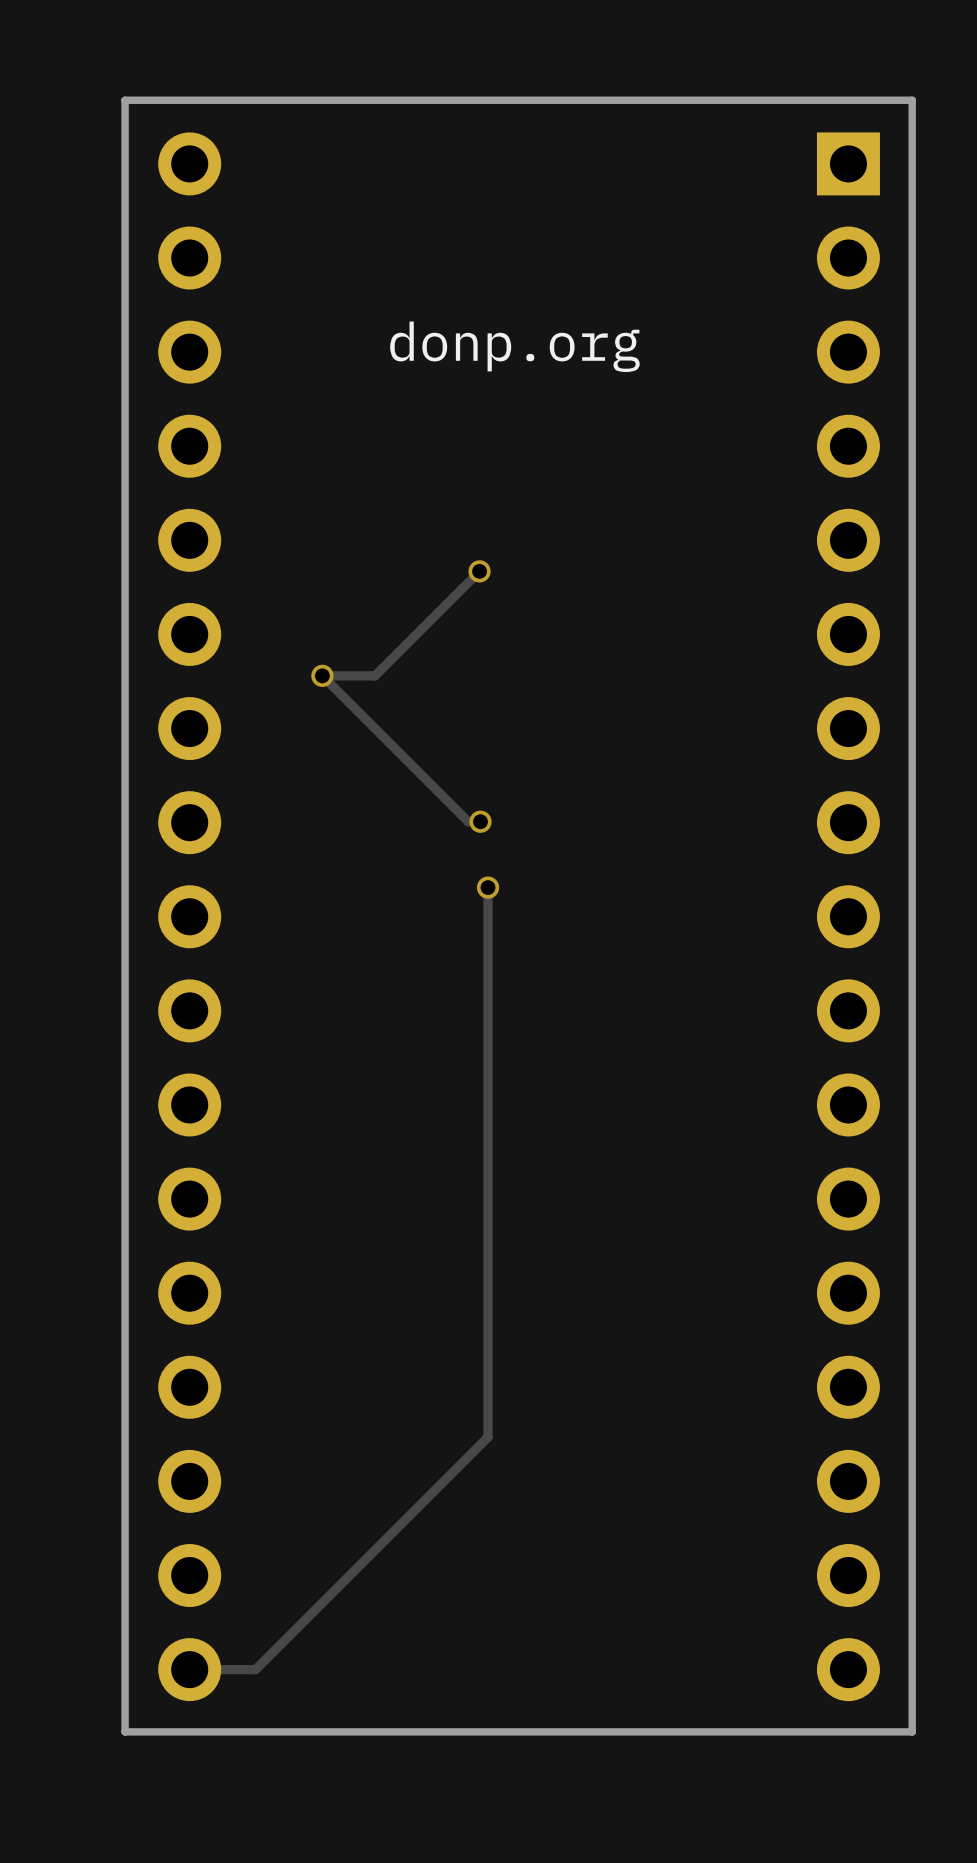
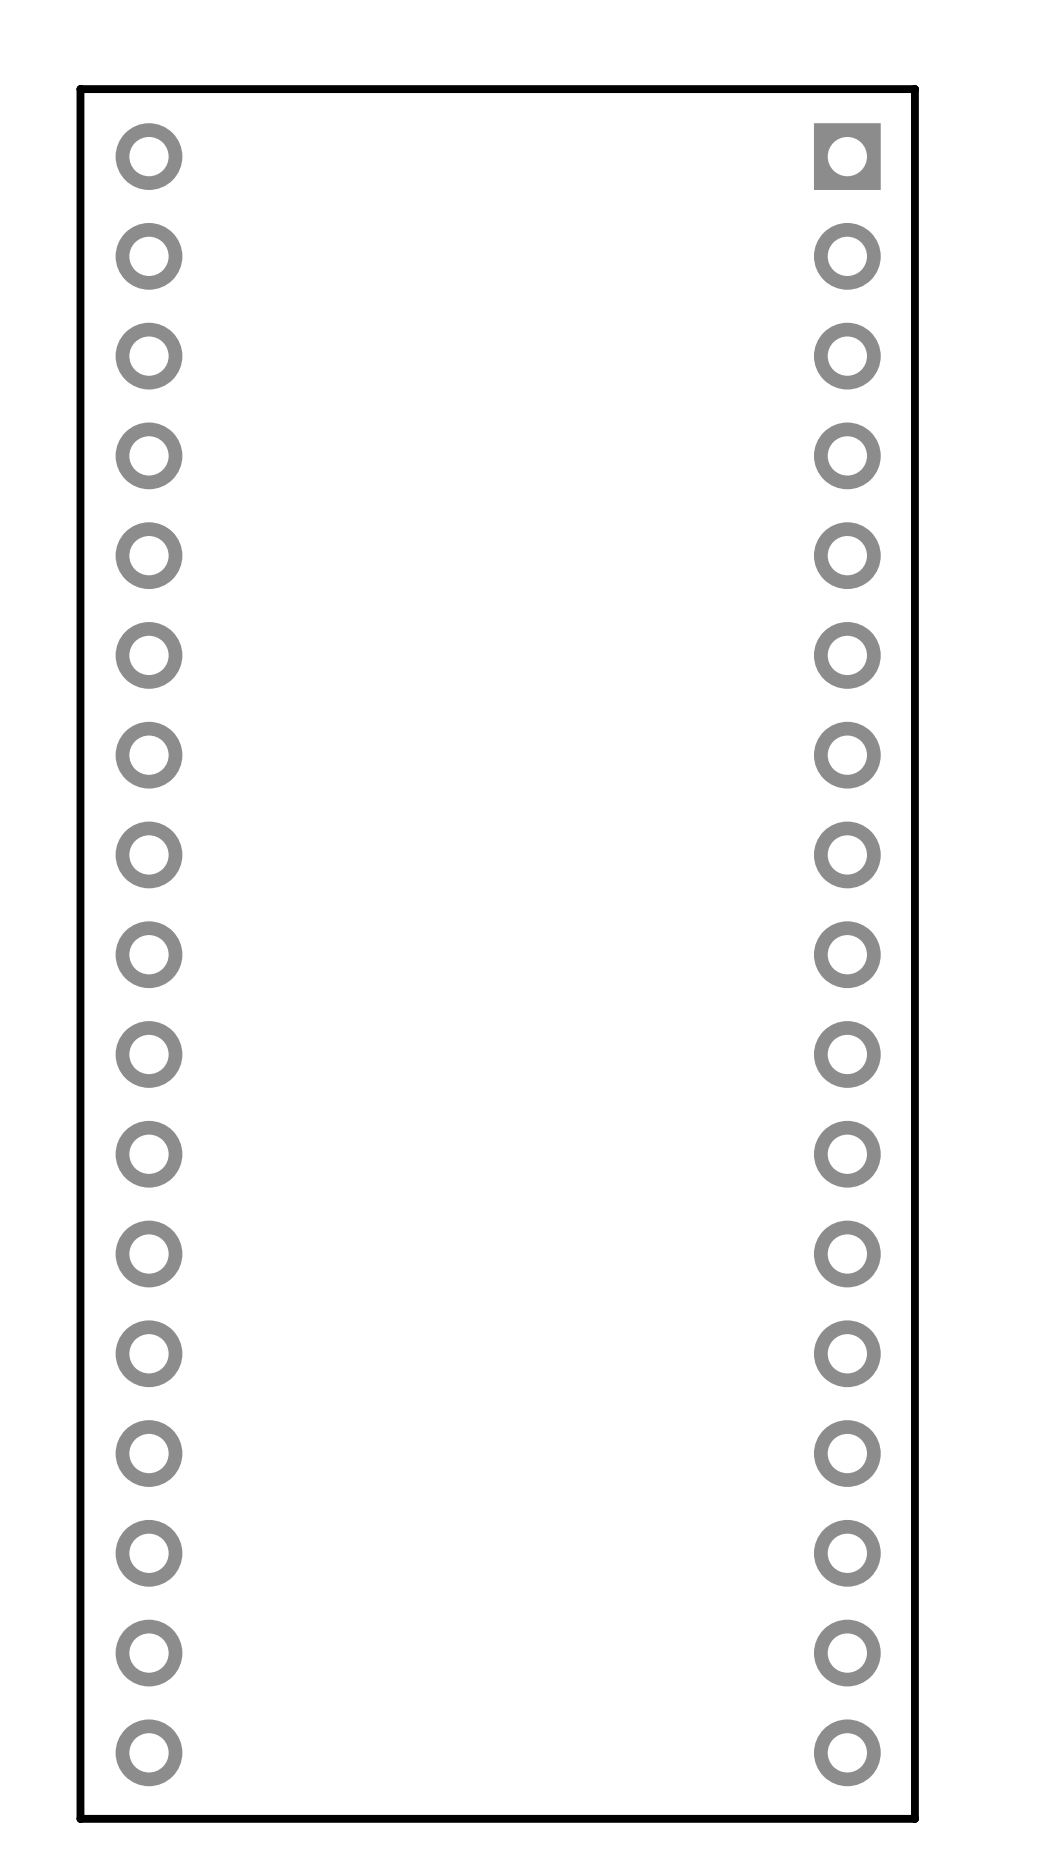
text: donp.org (514, 346) -> none
track: (479, 571) (375, 675) (322, 675) (468, 821) (480, 821) -> none
via: (479, 571) -> none
via: (322, 675) -> none
via: (480, 821) -> none
track: (488, 887) (488, 1437) (255, 1669) (189, 1669) -> none
via: (488, 887) -> none

